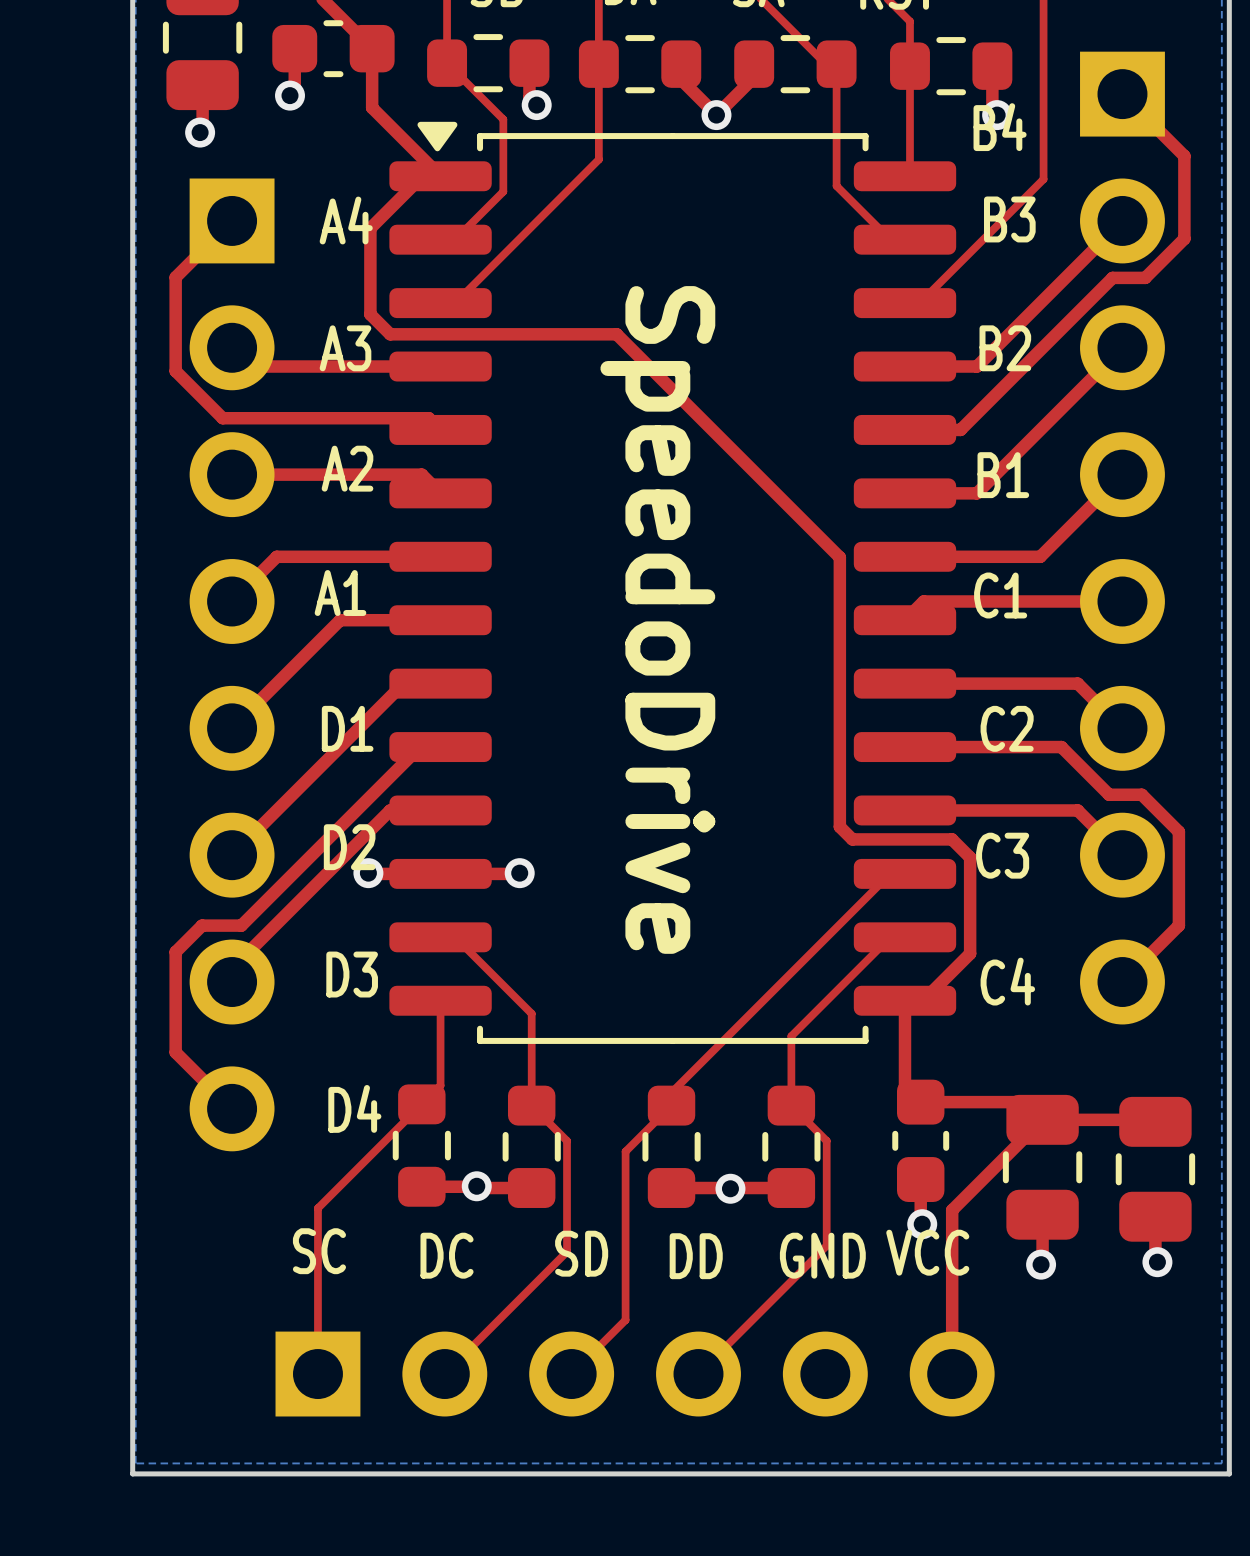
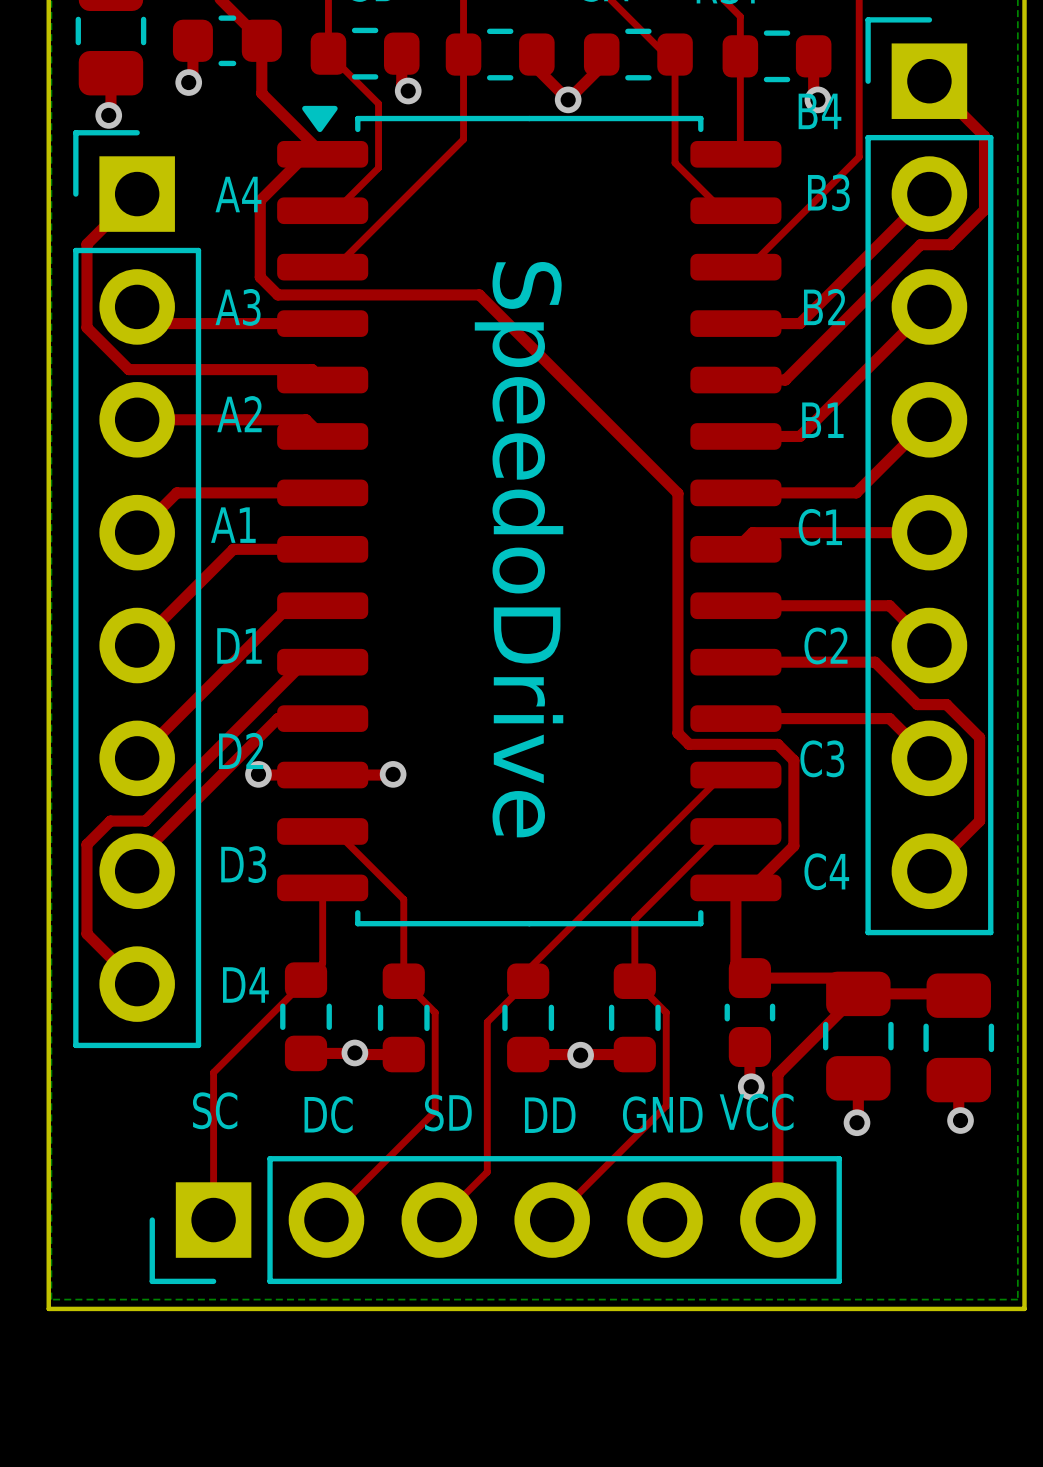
part side: bottom (1122, 538) -> top (929, 476)
part side: bottom (232, 664) -> top (137, 589)
part side: bottom (635, 1374) -> top (495, 1220)

